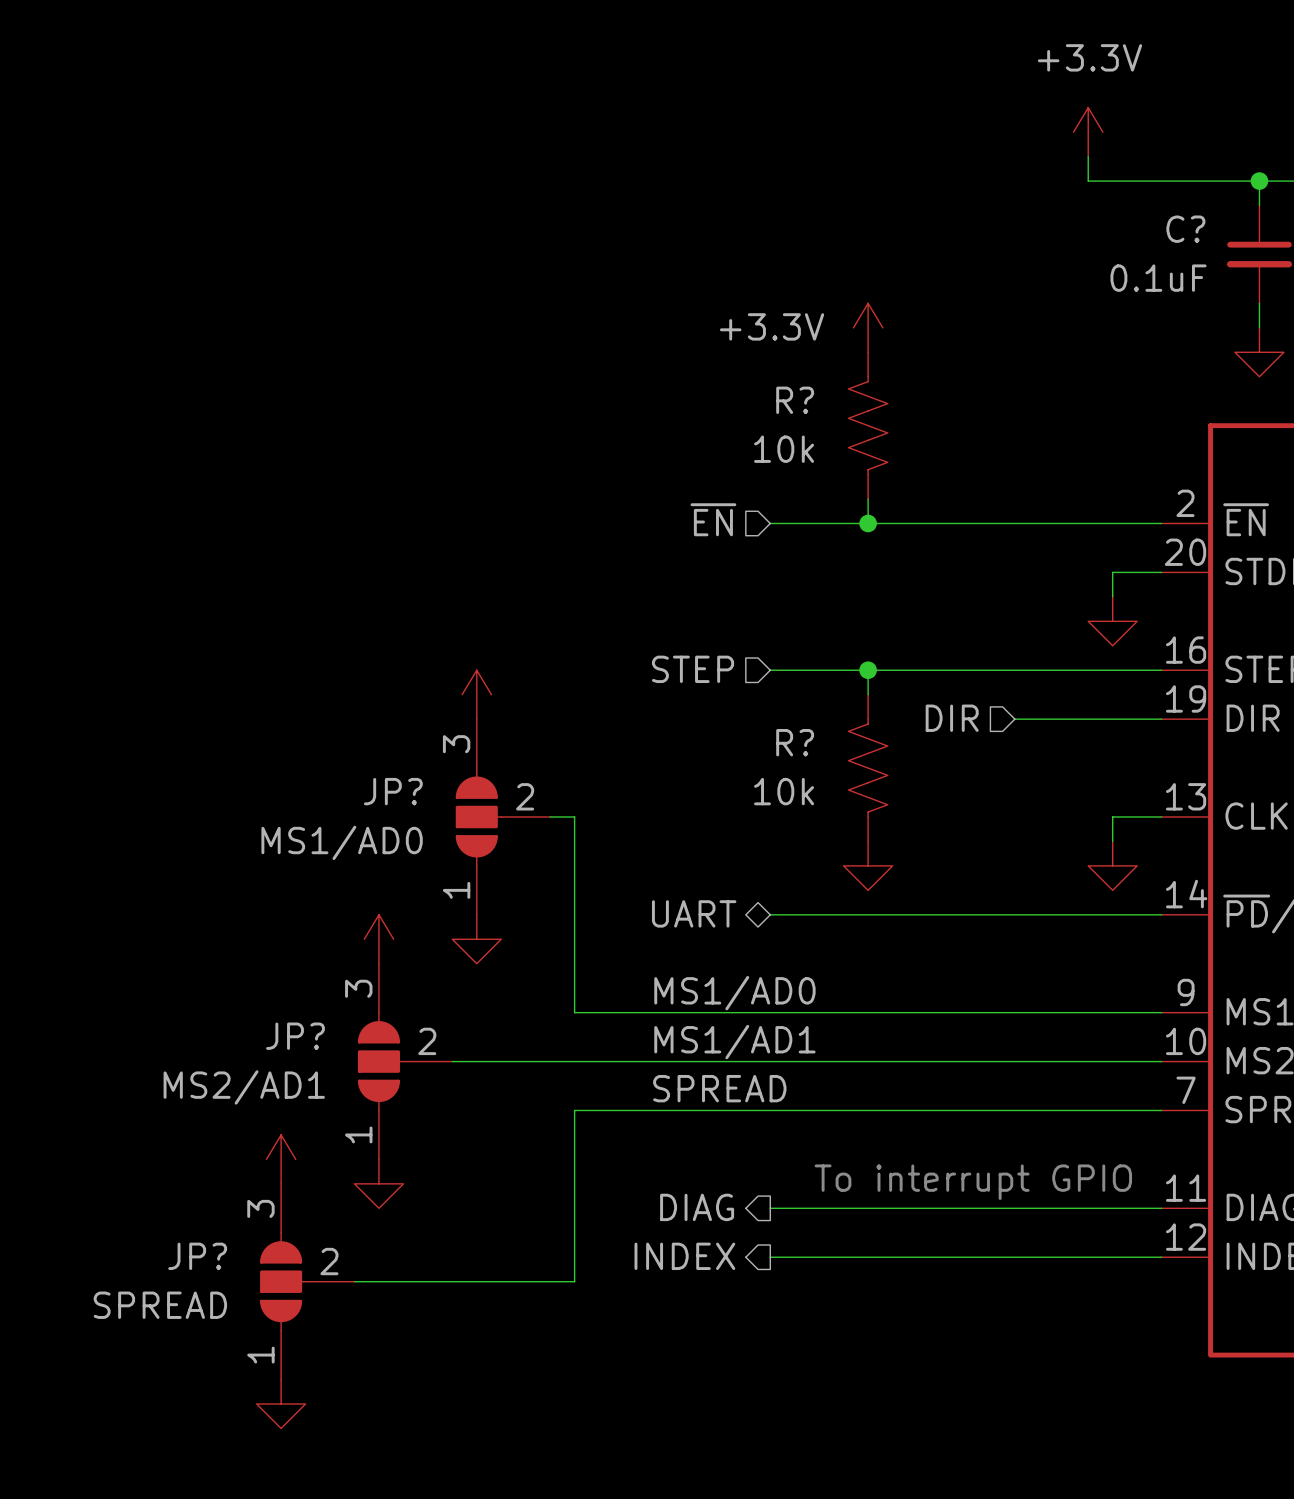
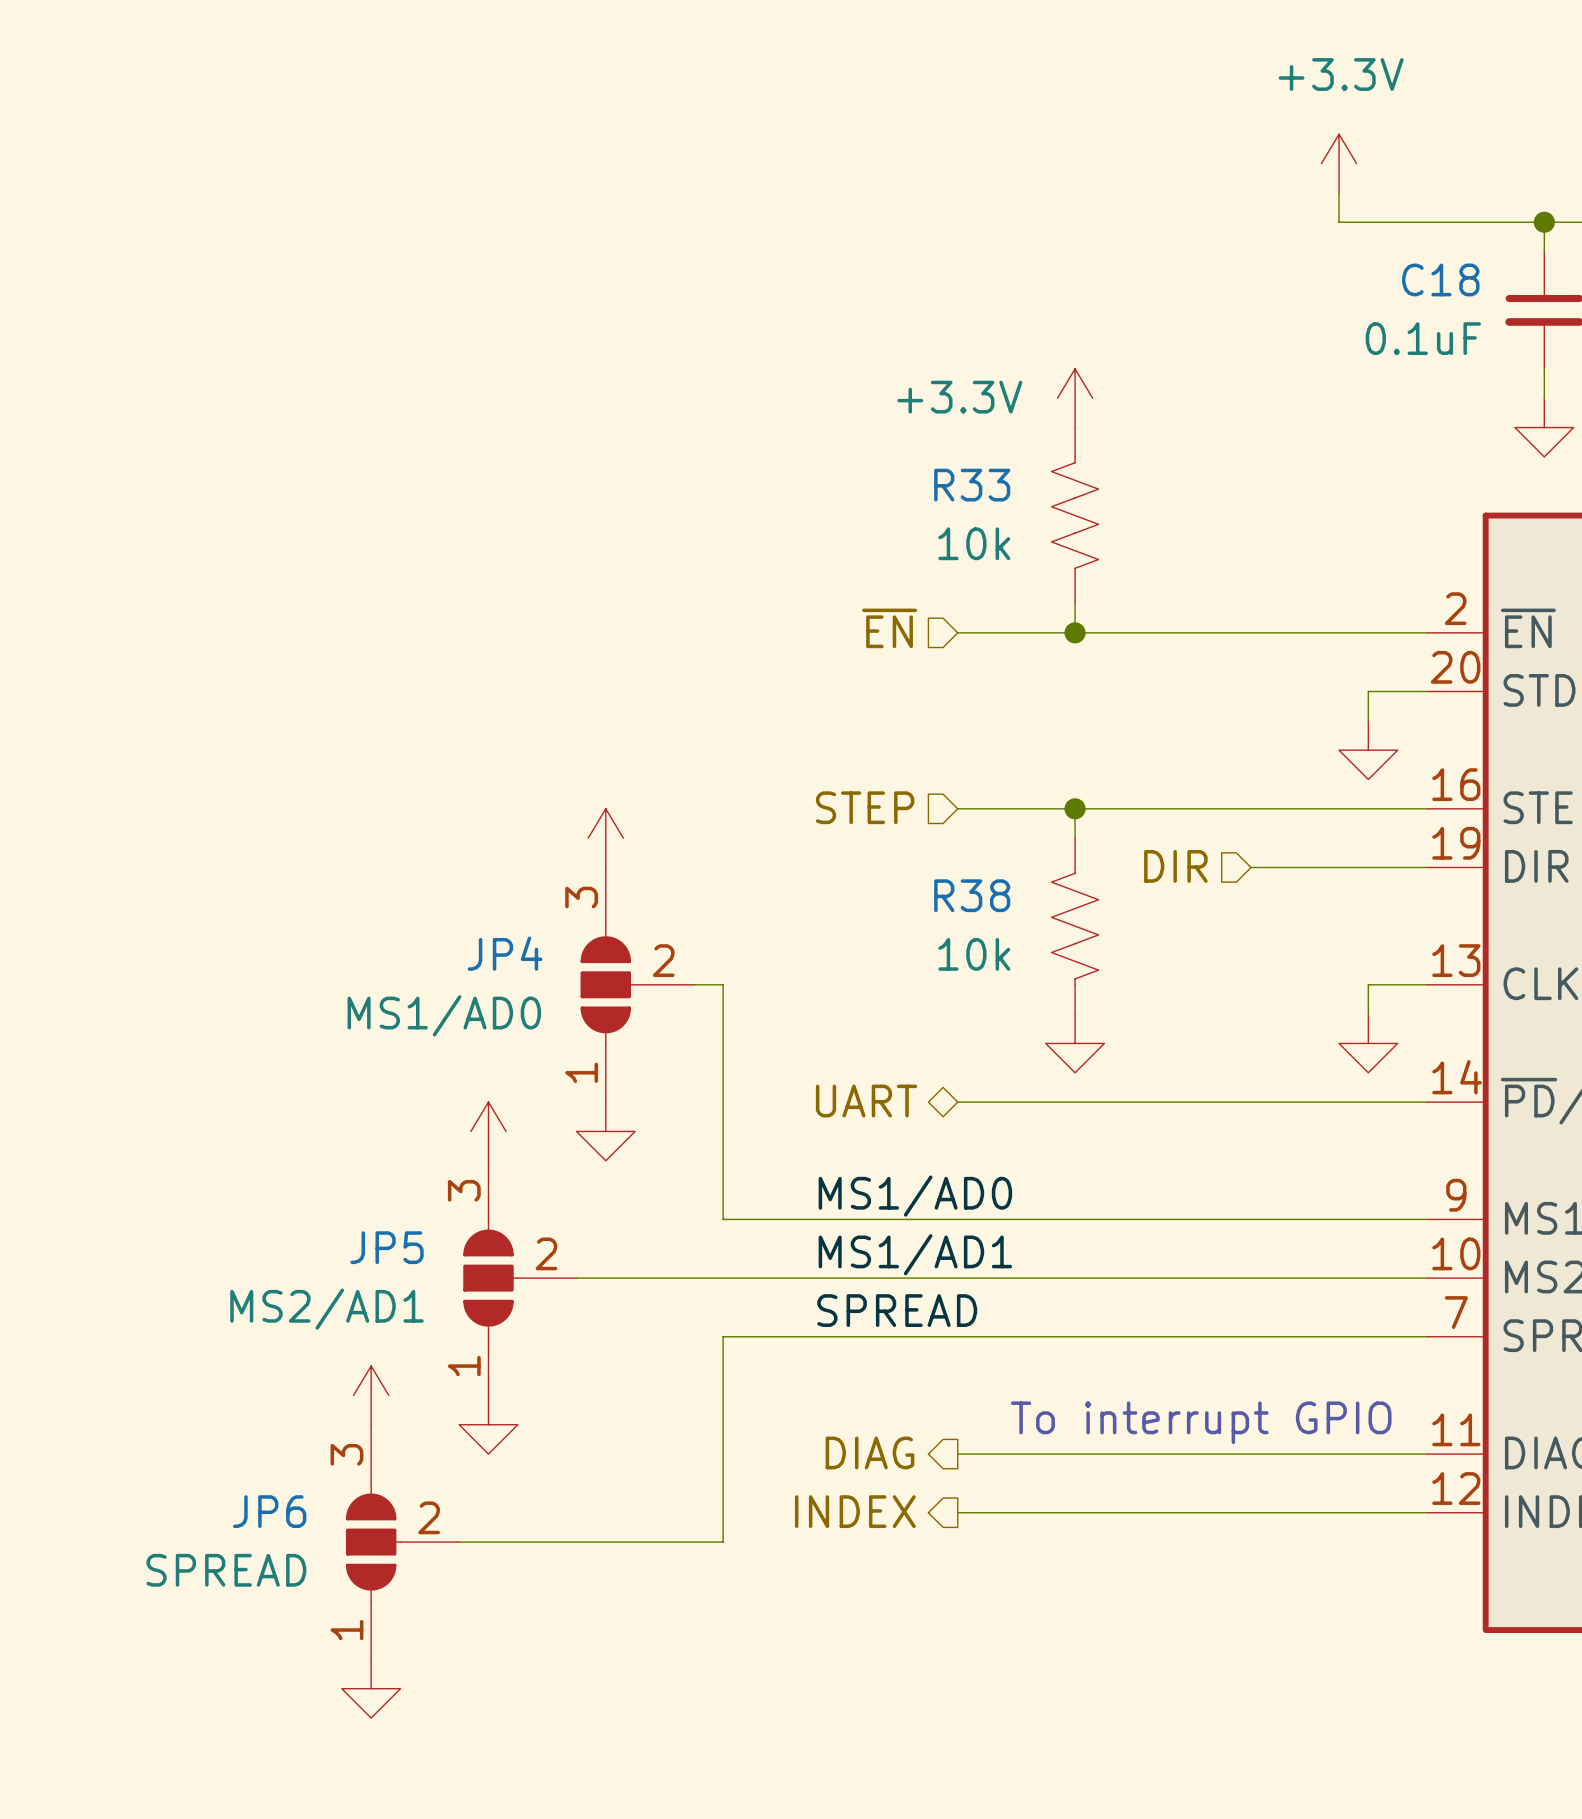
C? name: C? (1185, 229) -> C18 (1440, 279)
R? name: R? (795, 400) -> R33 (972, 485)
R? name: R? (795, 742) -> R38 (972, 895)
JP? name: JP? (393, 791) -> JP4 (505, 953)
JP? name: JP? (295, 1036) -> JP5 (387, 1247)
JP? name: JP? (197, 1256) -> JP6 (269, 1511)

